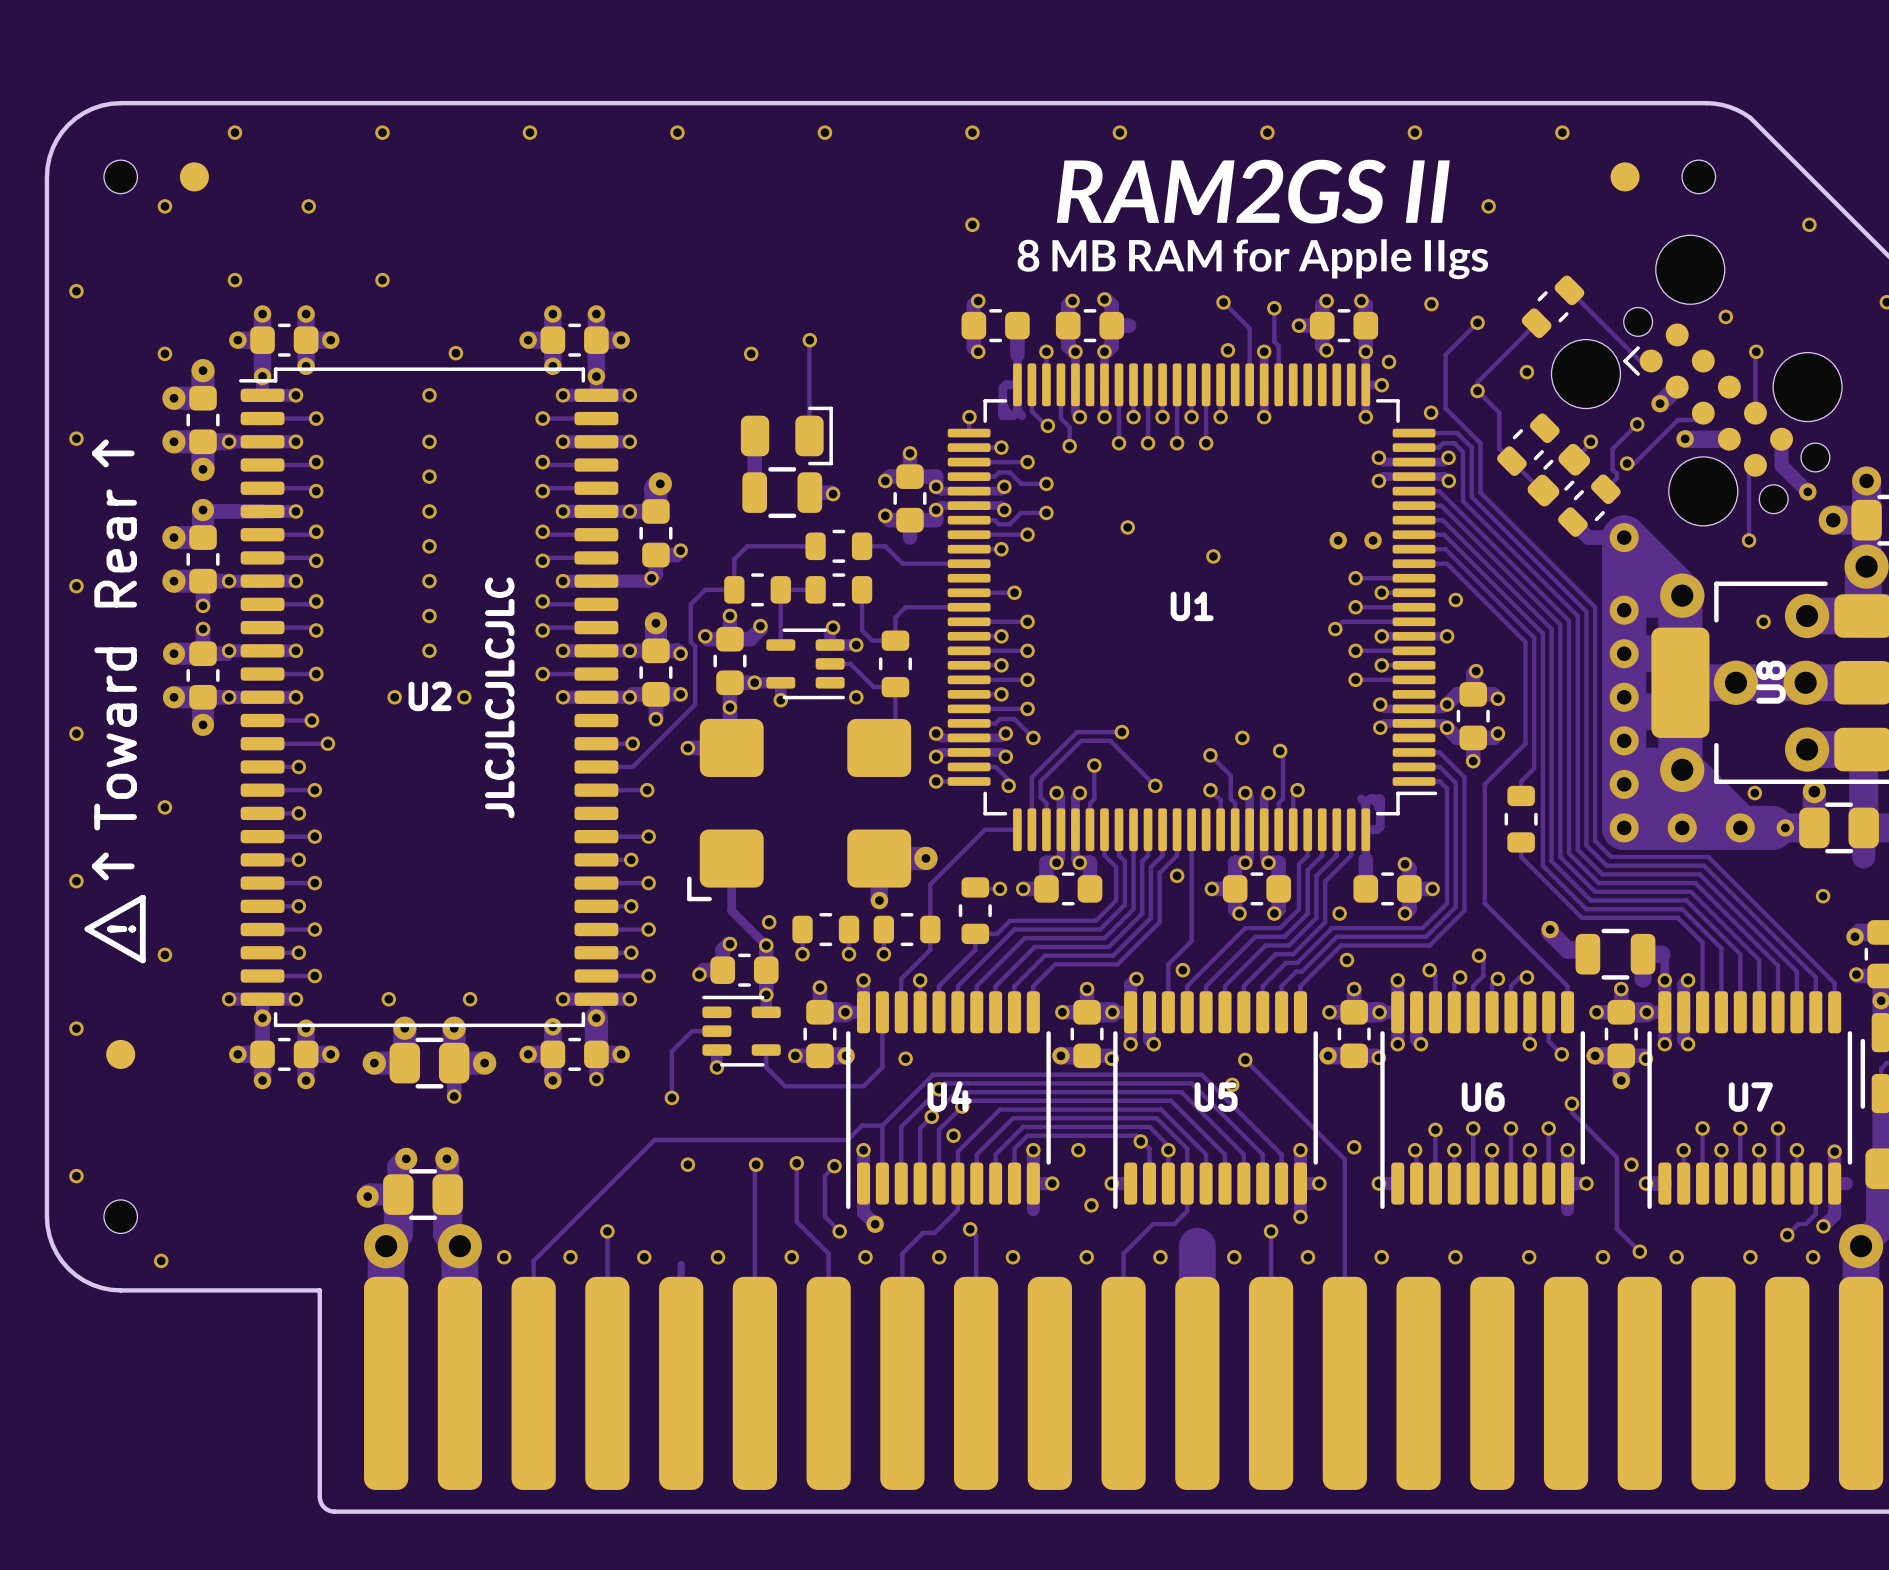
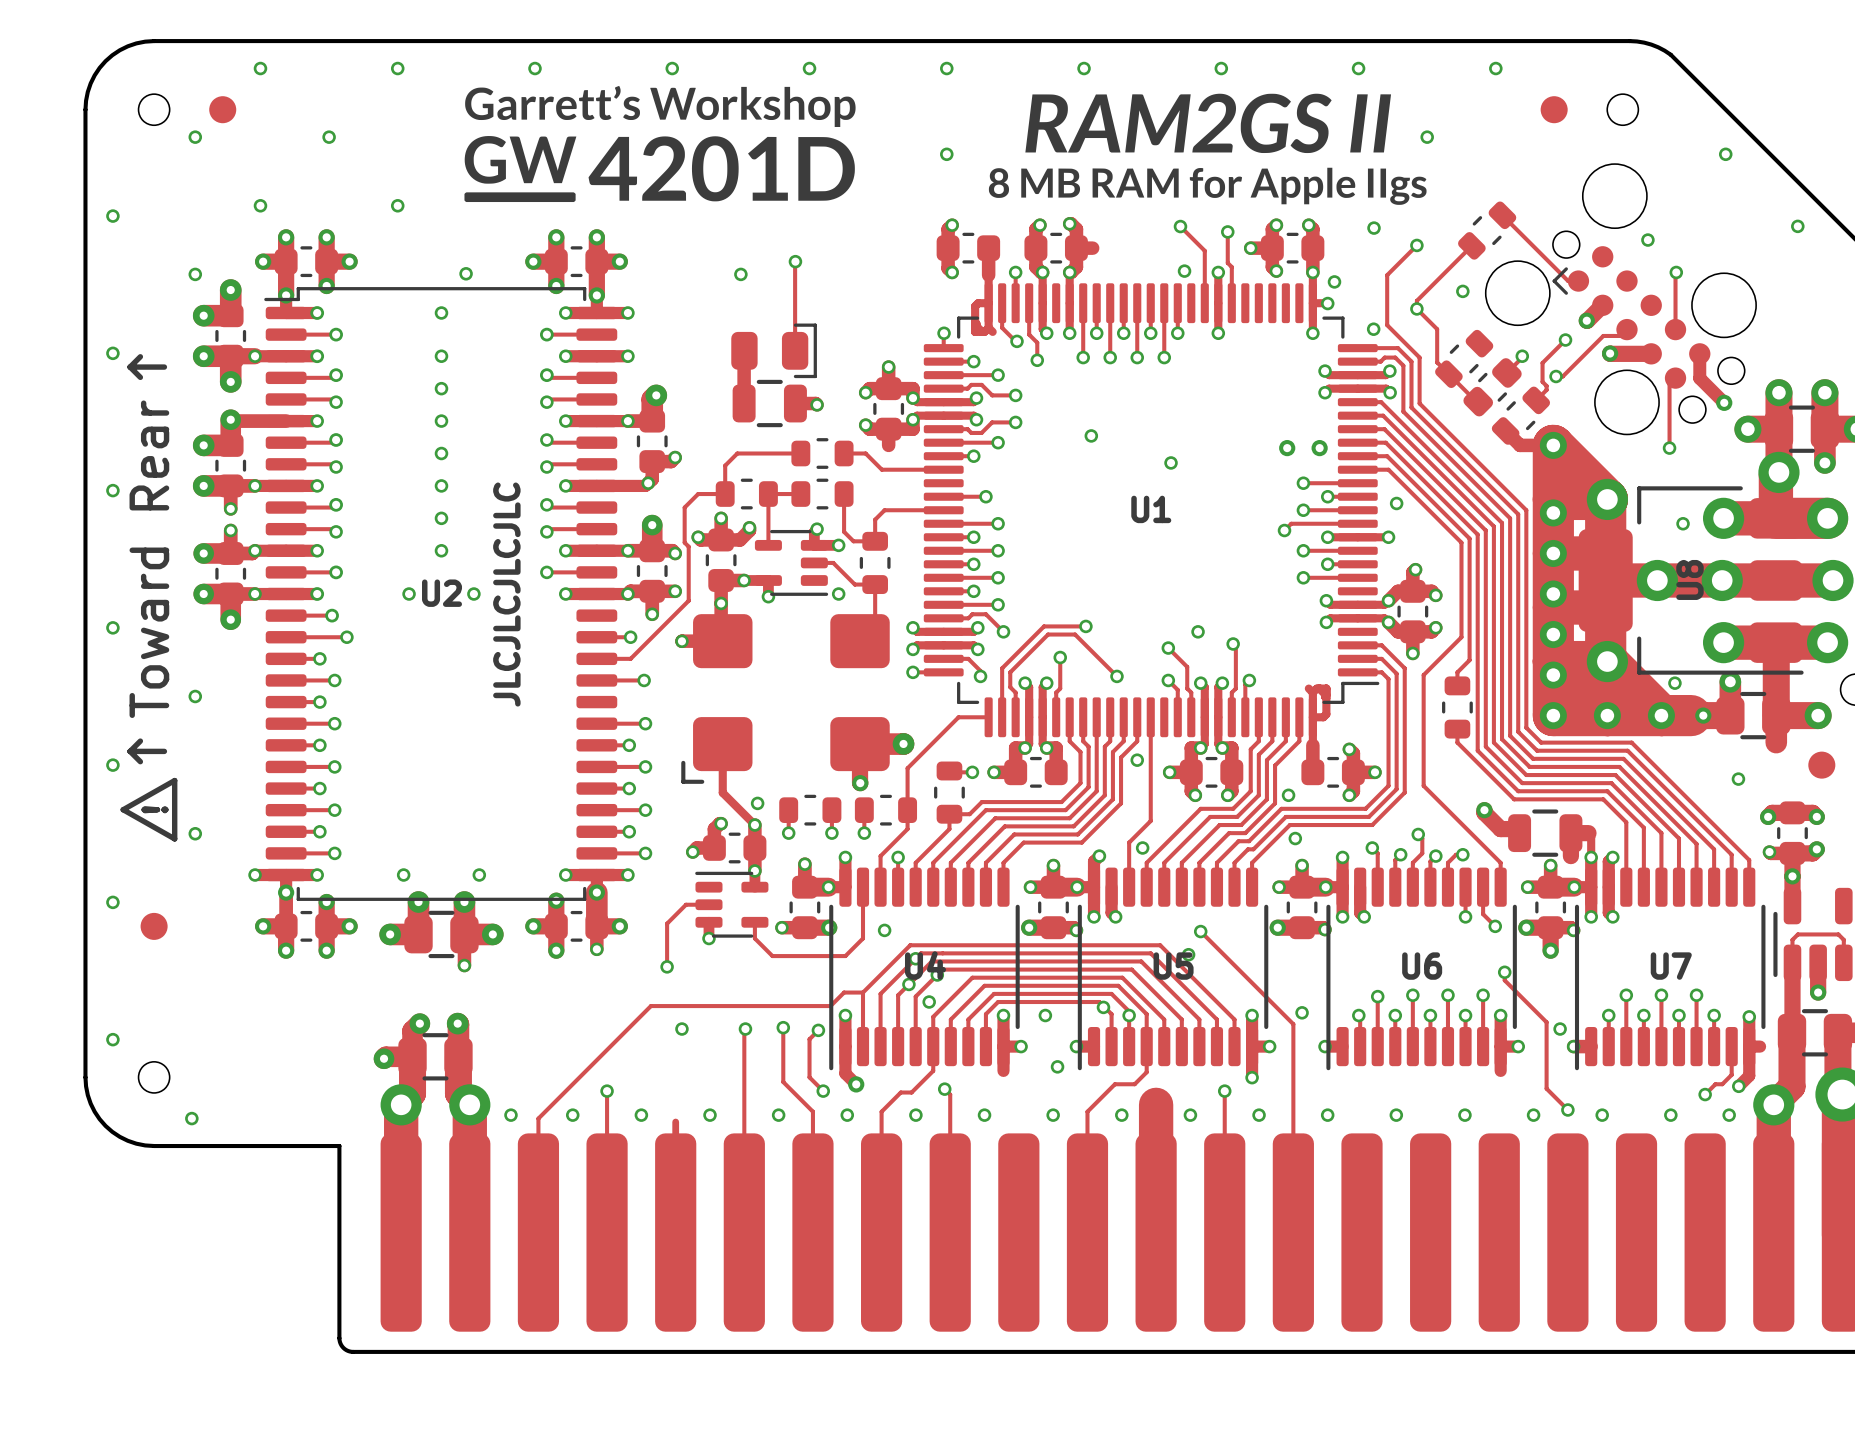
drawing: none -> [464, 85, 856, 203]

